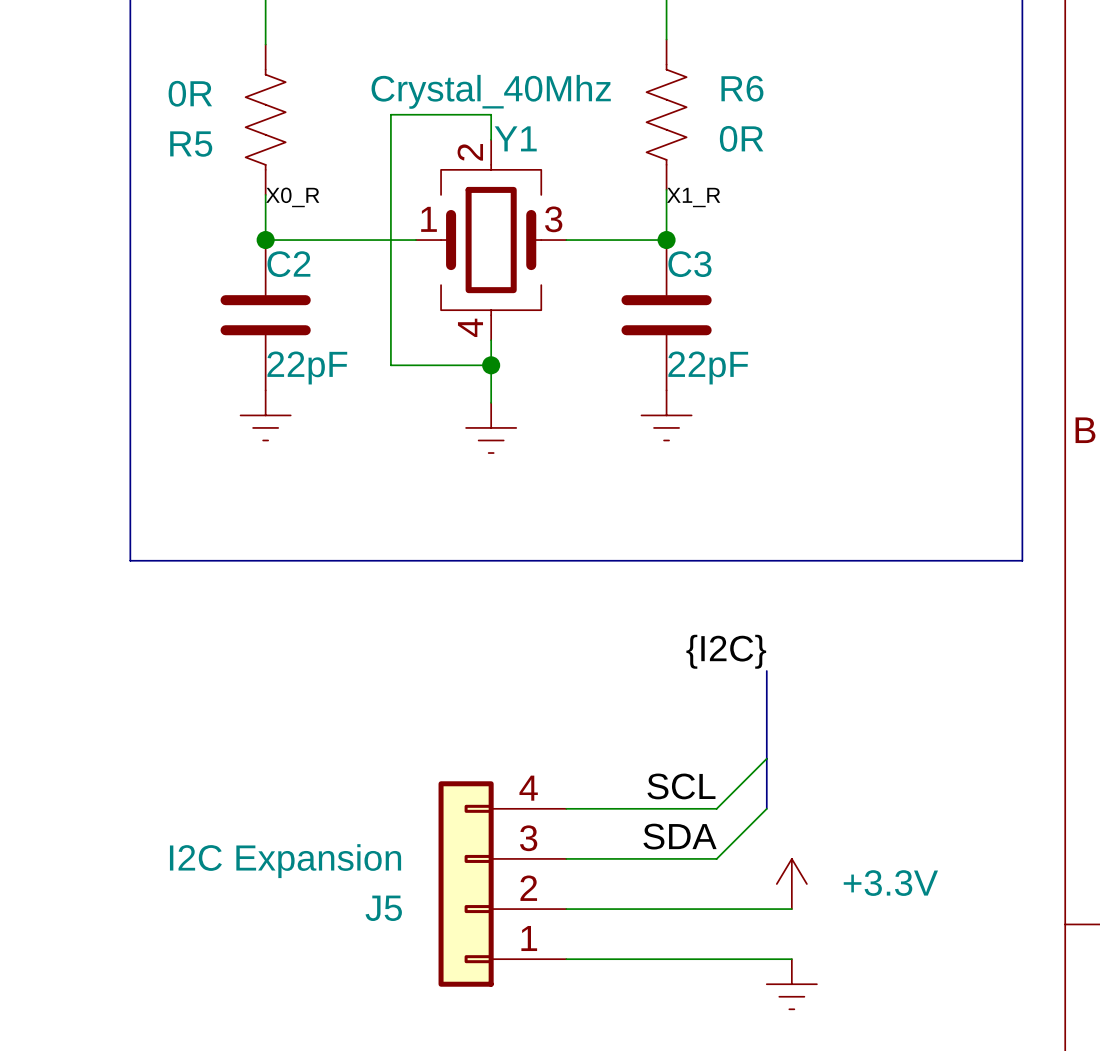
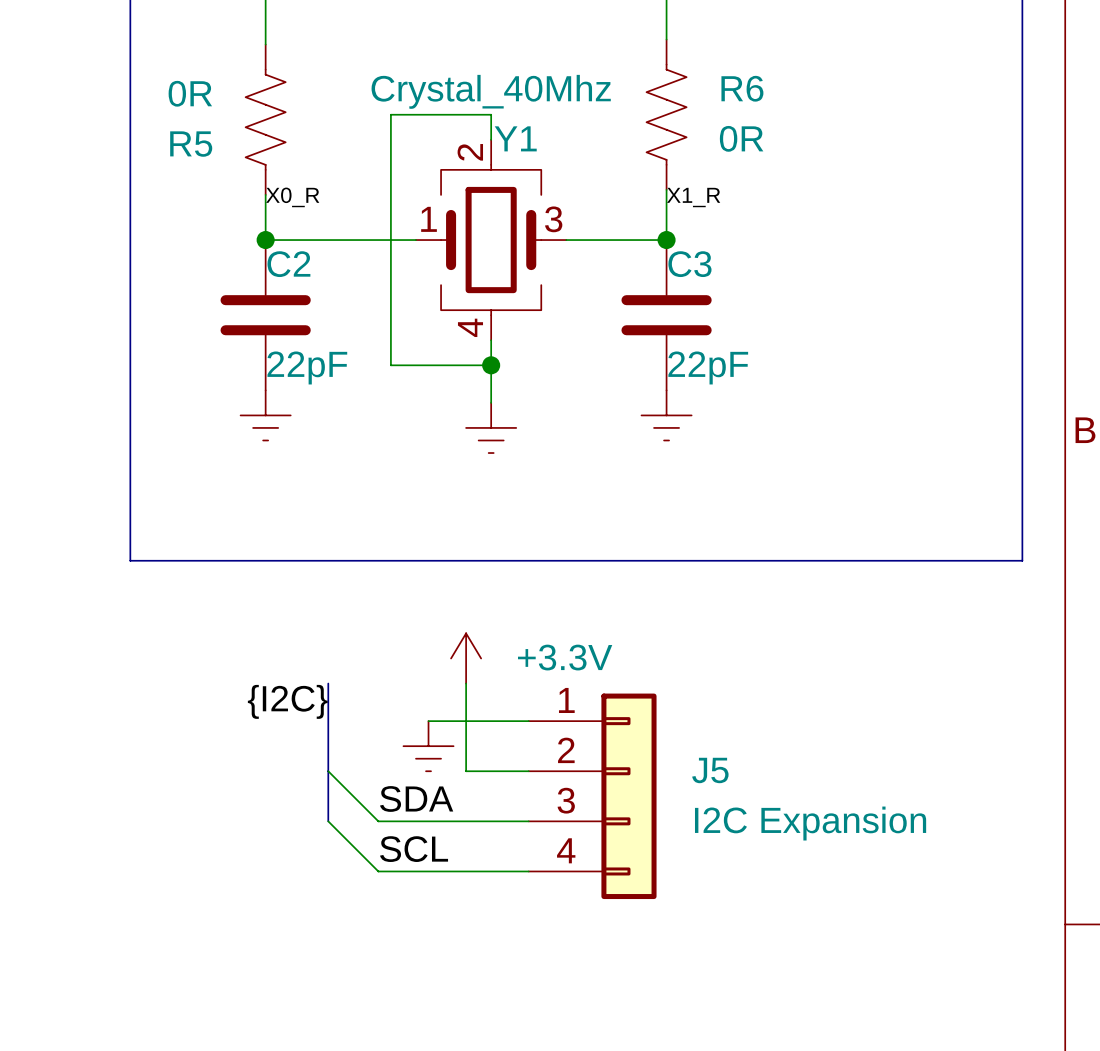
label position: {I2C} (726, 651) -> {I2C} (287, 701)
bus: (766, 671) (766, 808) -> (328, 683) (328, 821)
wire: none -> (466, 683) (466, 771) (528, 771)
wire: none -> (428, 721) (528, 721)
wire: (766, 758) (716, 808) (566, 808) -> none
wire: none -> (328, 771) (378, 821) (528, 821)
label position: SCL (681, 786) -> SCL (414, 849)
wire: (766, 808) (716, 858) (566, 858) -> none
wire: none -> (328, 821) (378, 871)
label position: SDA (680, 836) -> SDA (416, 798)
wire: none -> (378, 871) (528, 871)
J5 rotation: 0° (466, 884) -> 180° (628, 796)
J5 position: (502, 884) -> (592, 796)
power symbol position: +3.3V (791, 884) -> +3.3V (466, 658)
wire: (566, 909) (791, 909) -> none
wire: (566, 959) (791, 959) -> none
power symbol position: (791, 984) -> (428, 746)

